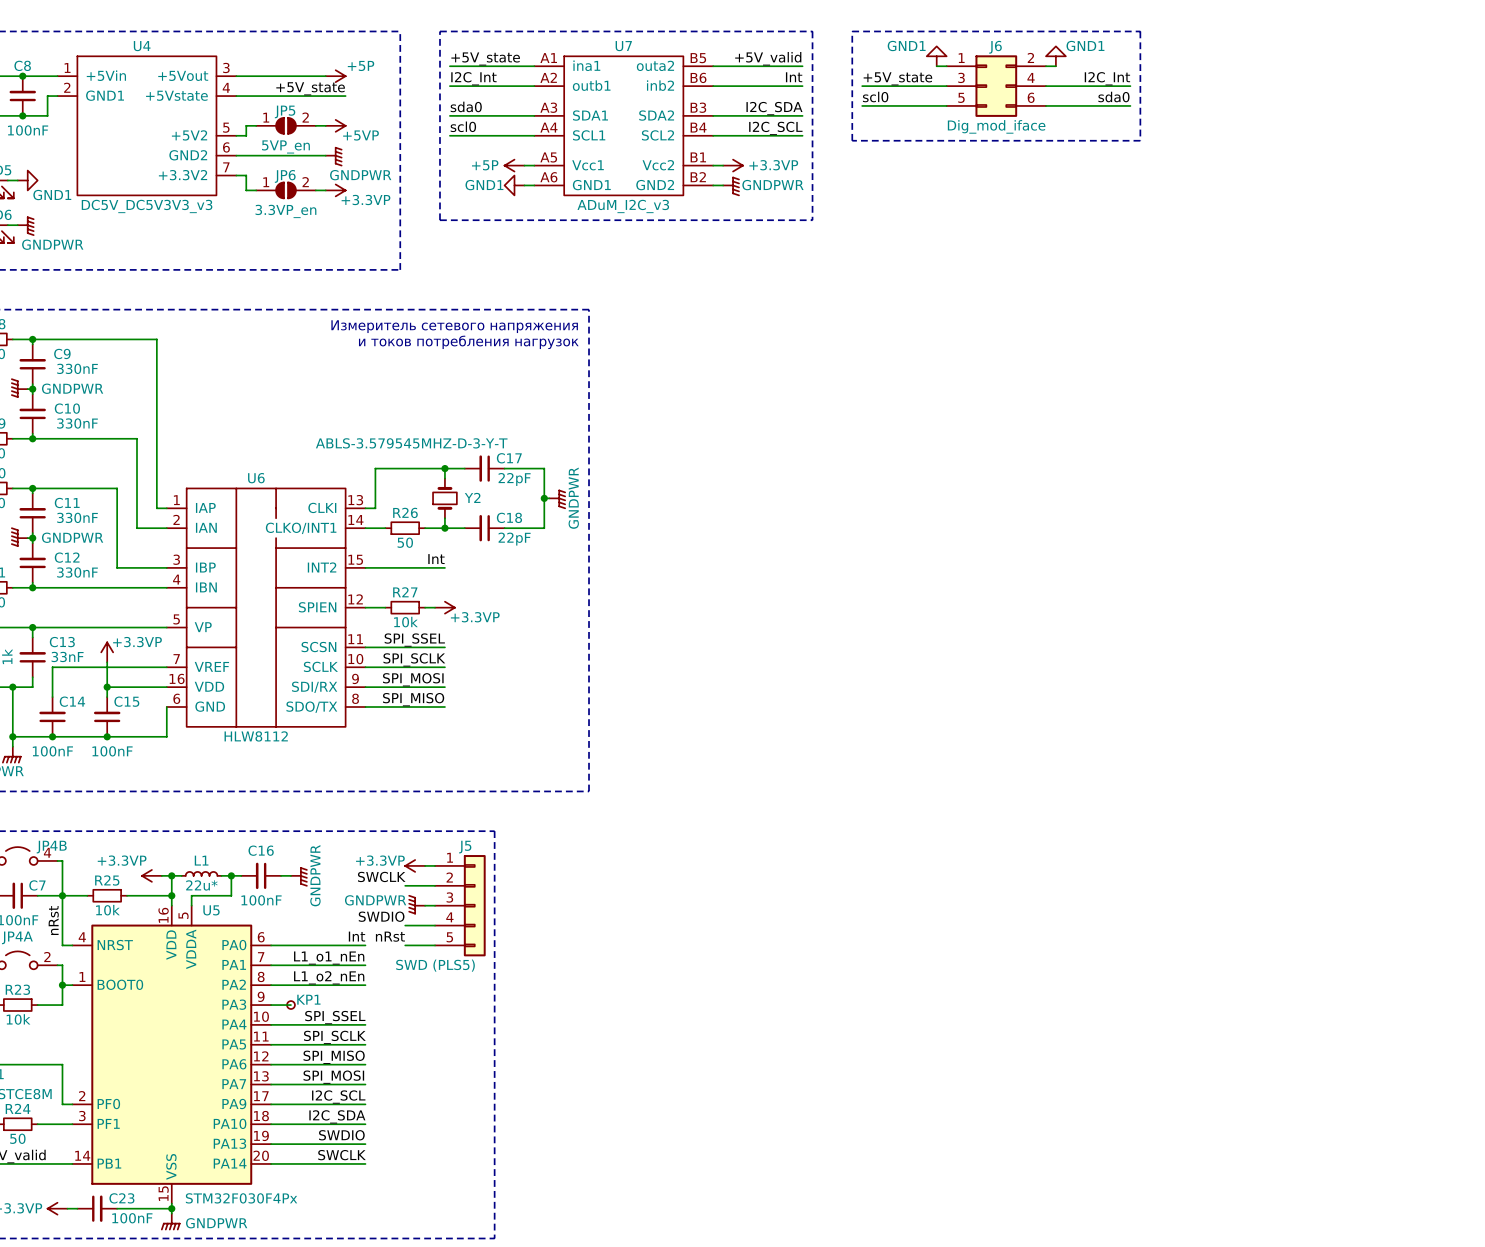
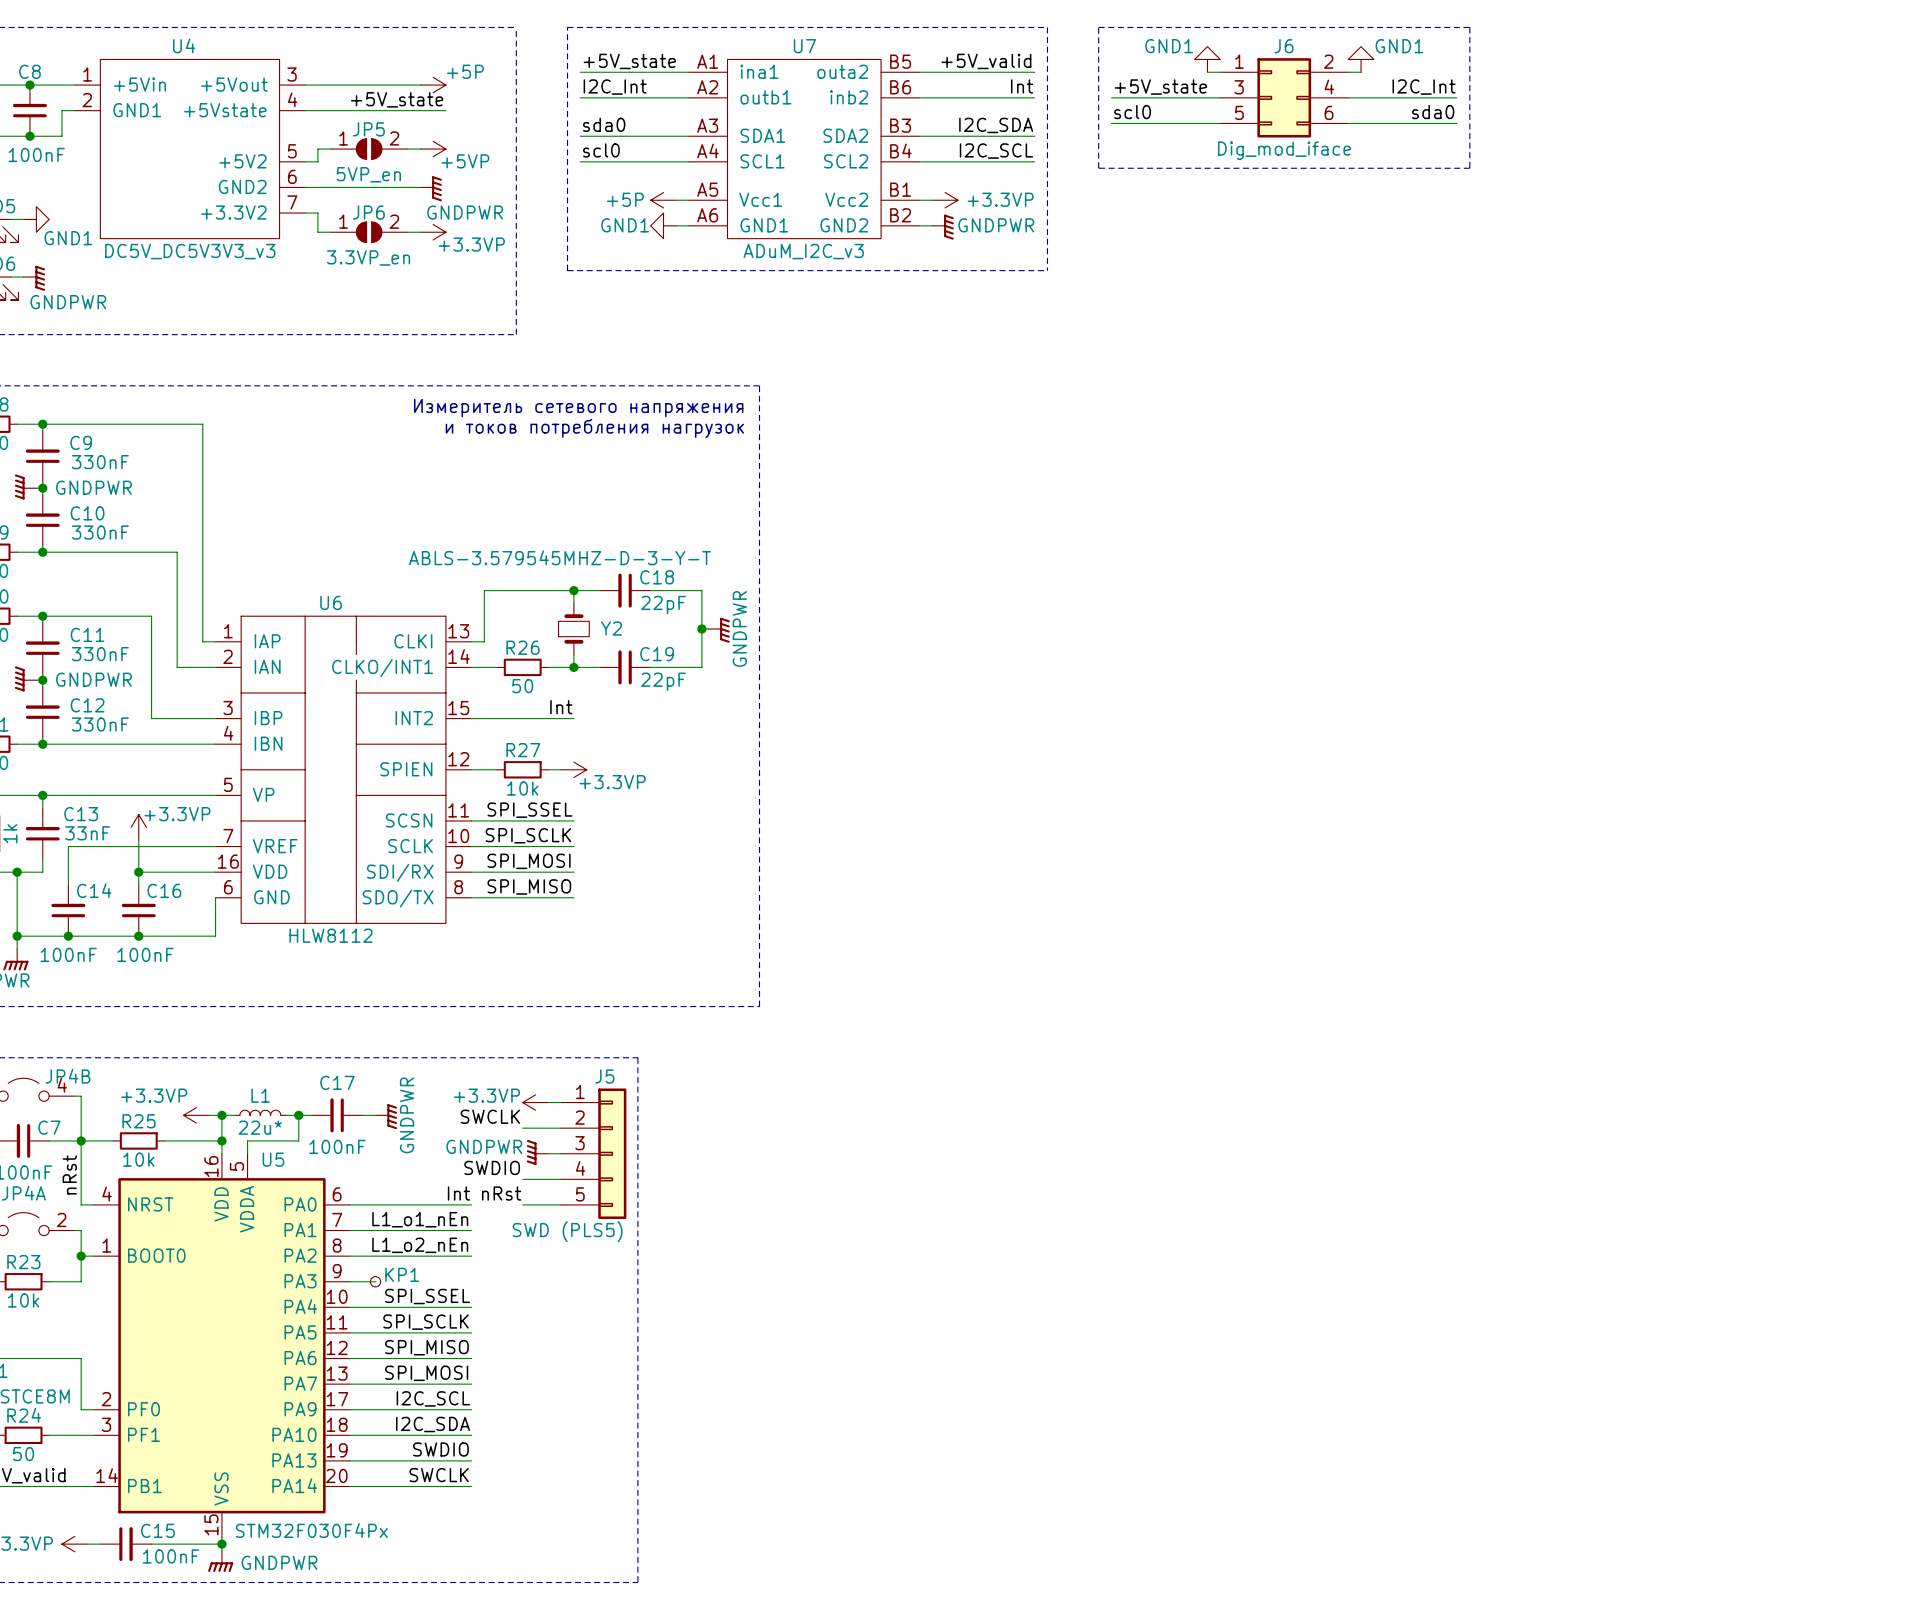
C17 name: C17 (509, 458) -> C18 (657, 577)
C18 name: C18 (509, 517) -> C19 (657, 654)
C15 name: C15 (126, 701) -> C16 (164, 890)
C16 name: C16 (261, 850) -> C17 (337, 1082)
C23 name: C23 (121, 1198) -> C15 (157, 1530)

